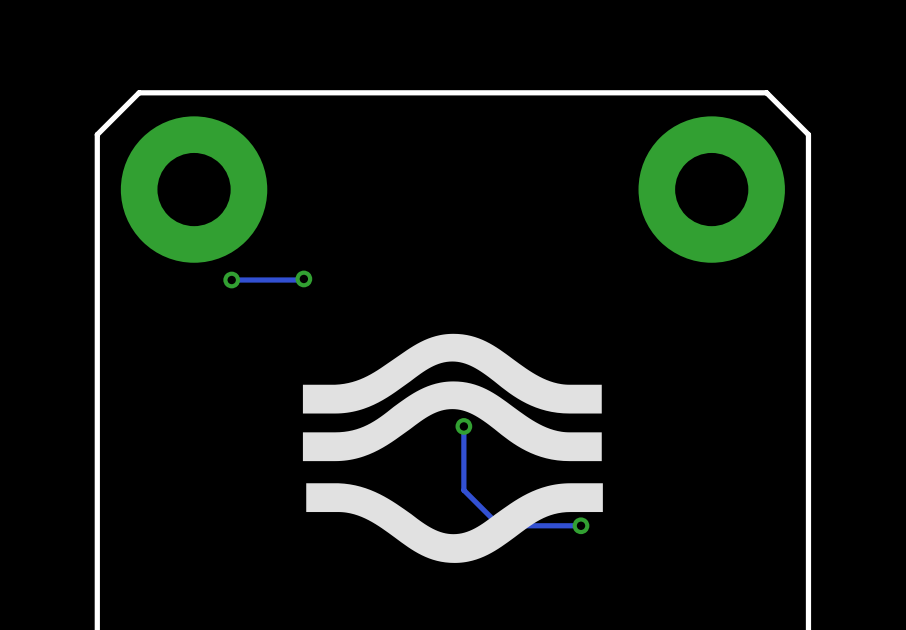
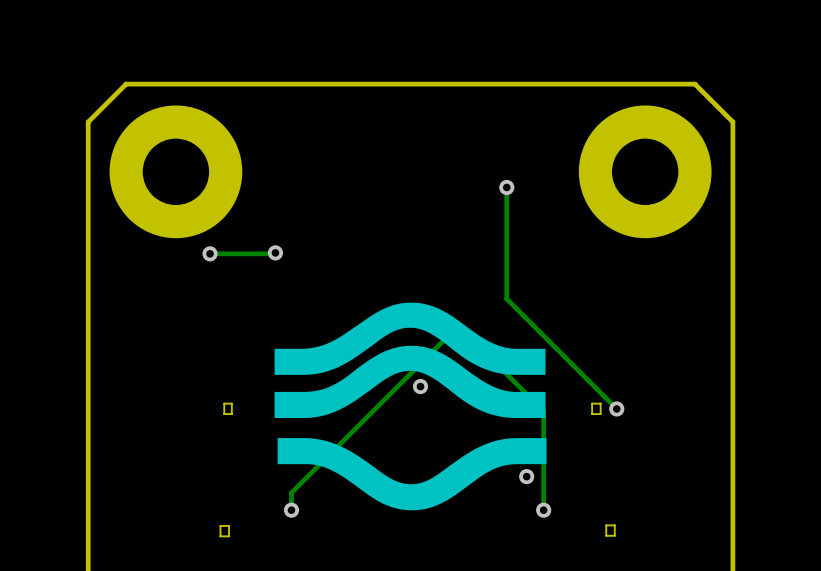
track: none -> (506, 187) (506, 298) (616, 408)
via: none -> (506, 187)
track: none -> (455, 328) (291, 492) (291, 510)
track: none -> (475, 342) (543, 411) (543, 510)
track: (463, 426) (463, 490) (499, 525) (581, 525) -> none
board edge: none -> (231, 403) (224, 403) (224, 414) (231, 414) (231, 403)
board edge: none -> (600, 403) (592, 403) (592, 414) (600, 414) (600, 403)
via: none -> (616, 408)
via: none -> (291, 510)
via: none -> (543, 510)
board edge: none -> (614, 525) (606, 525) (606, 535) (614, 535) (614, 525)
board edge: none -> (229, 525) (220, 525) (220, 536) (229, 536) (229, 525)

